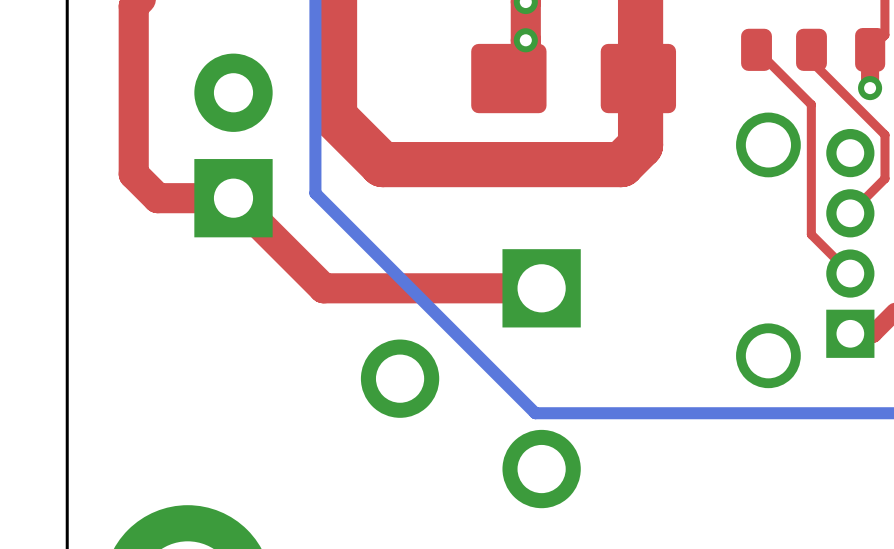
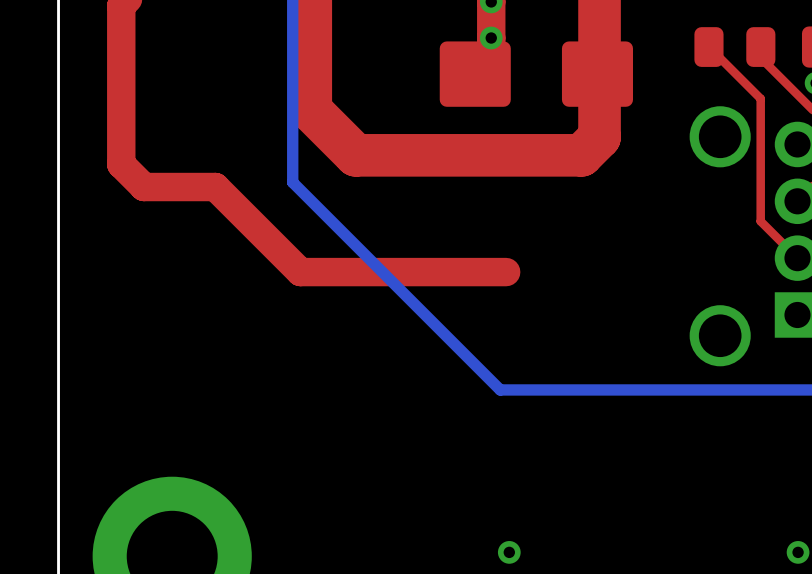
part: (233, 145) -> none
part: (470, 378) -> none

